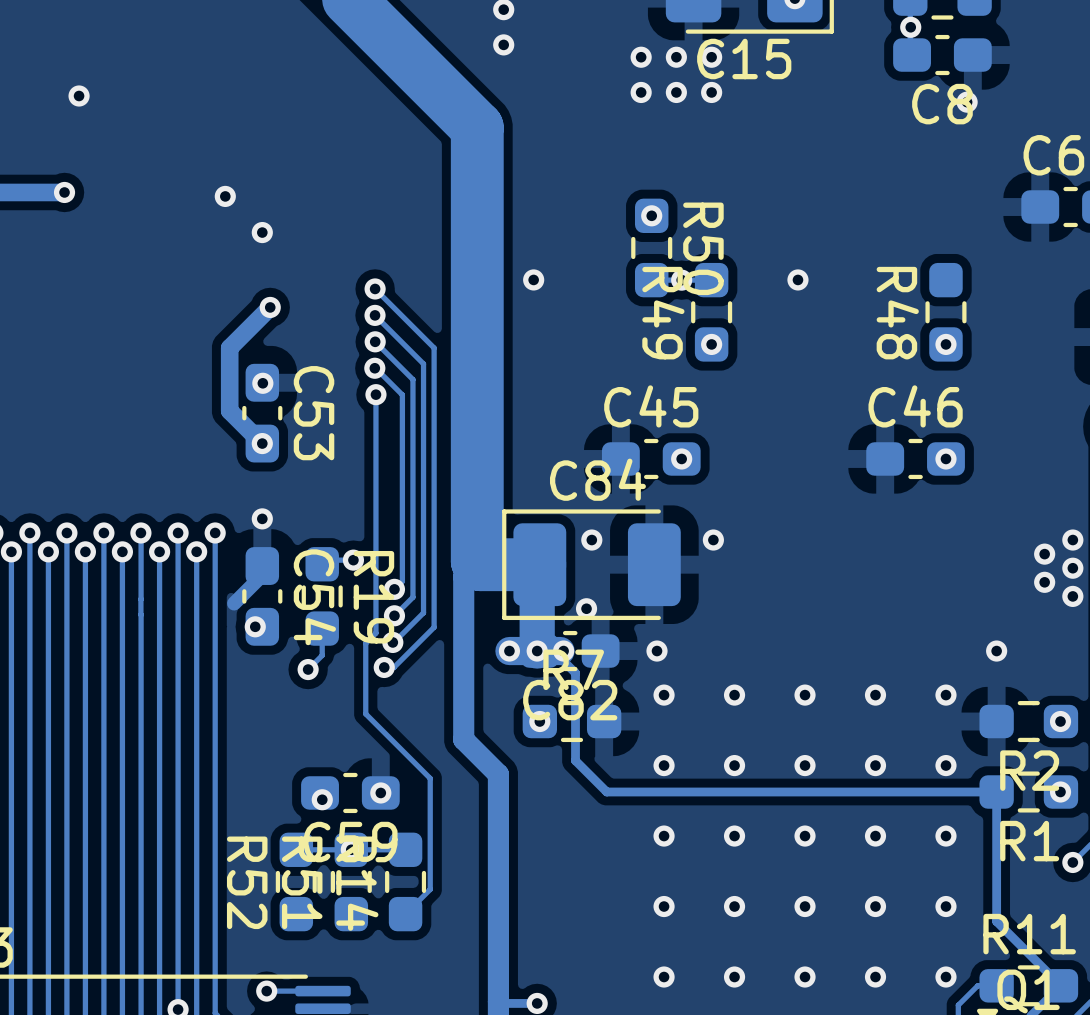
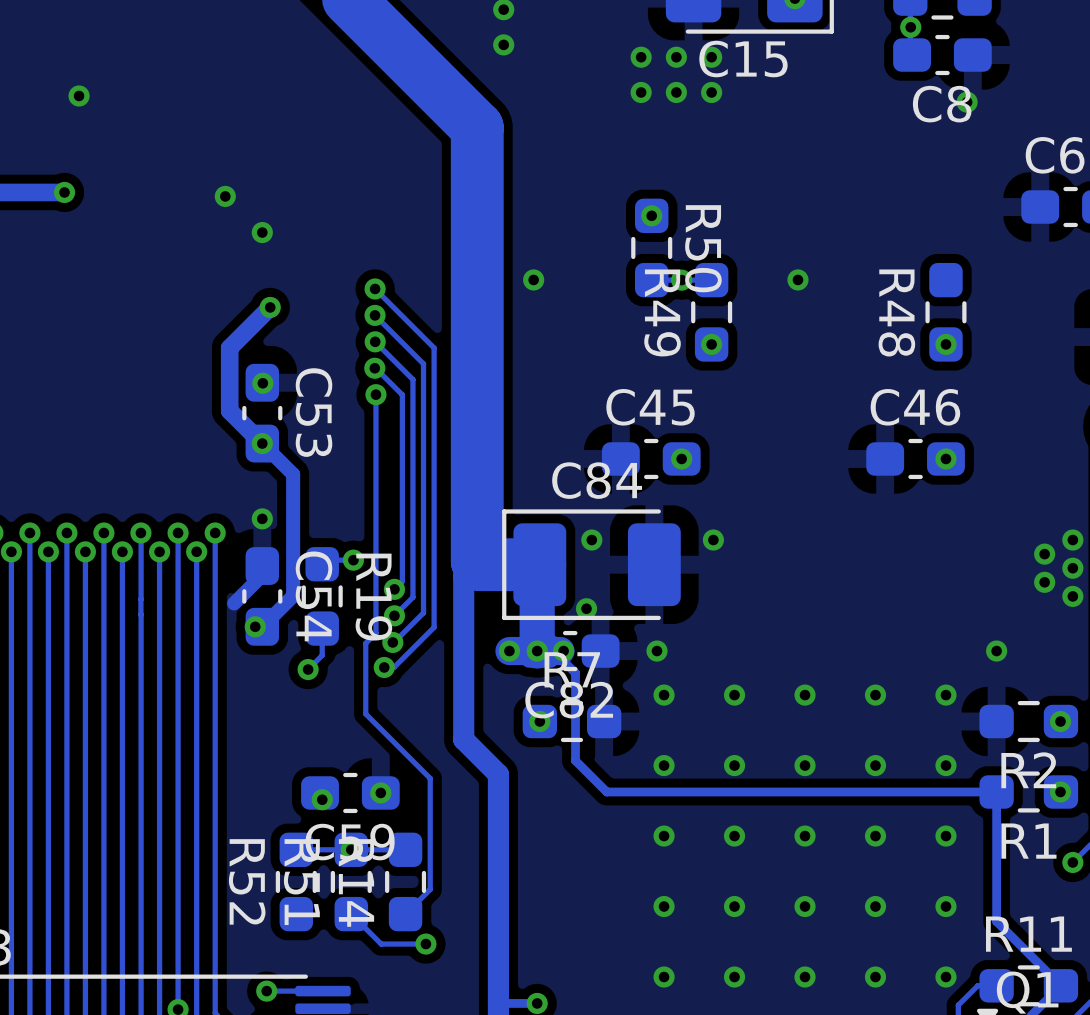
track: none -> (262, 443) (293, 474) (293, 595) (262, 626)
track: none -> (351, 914) (381, 944) (425, 944)
via: none -> (425, 944)

